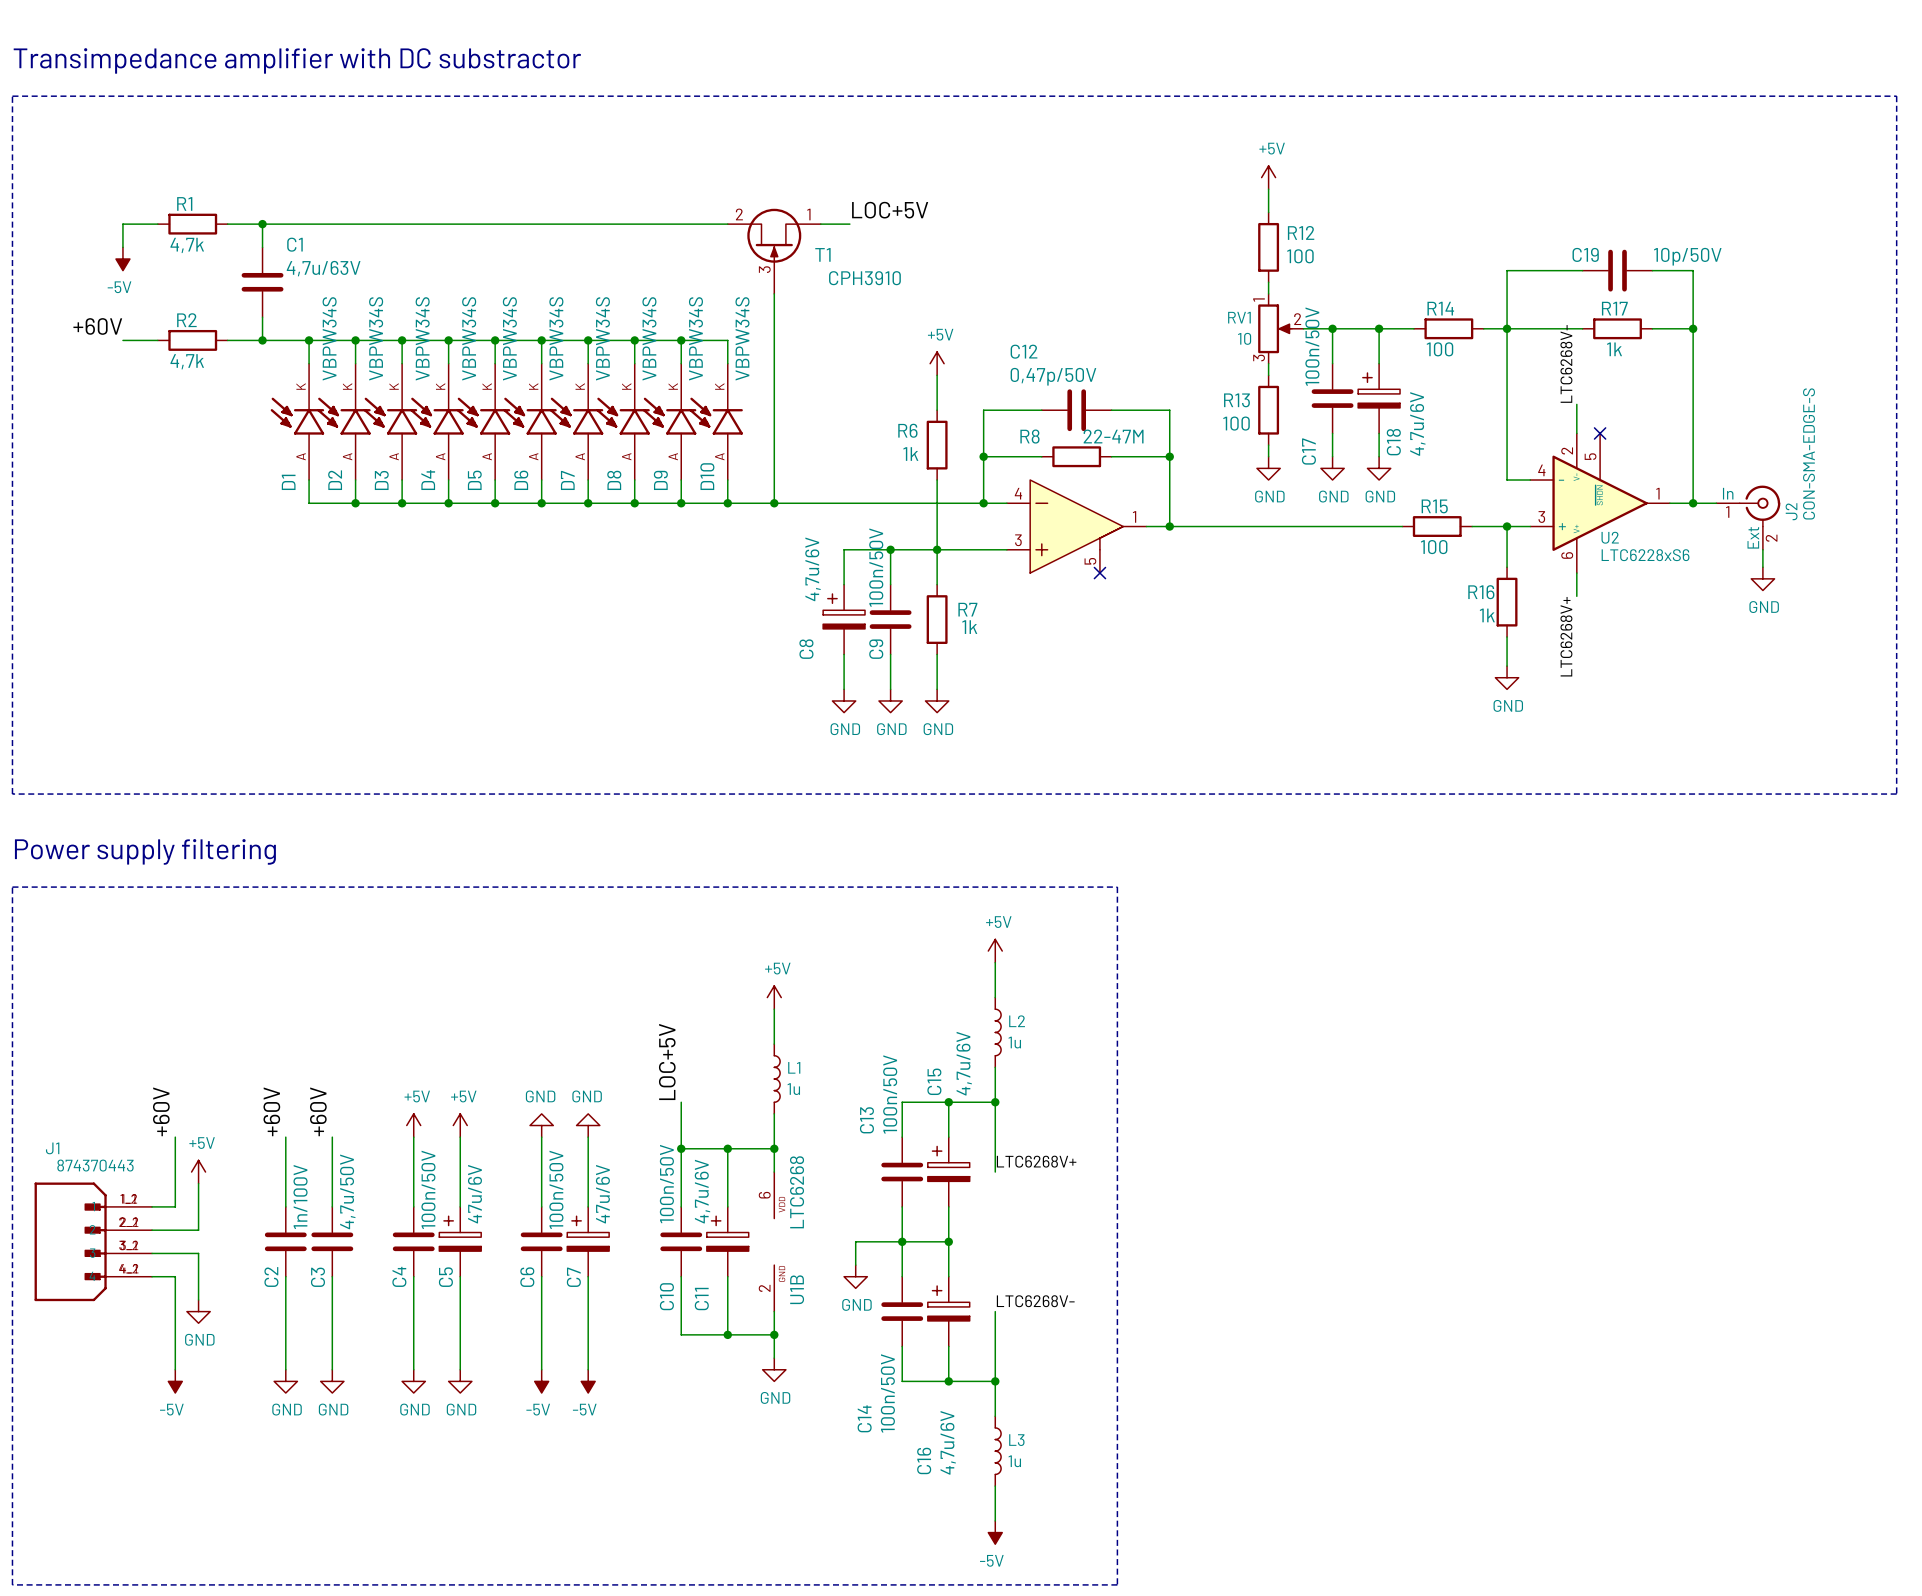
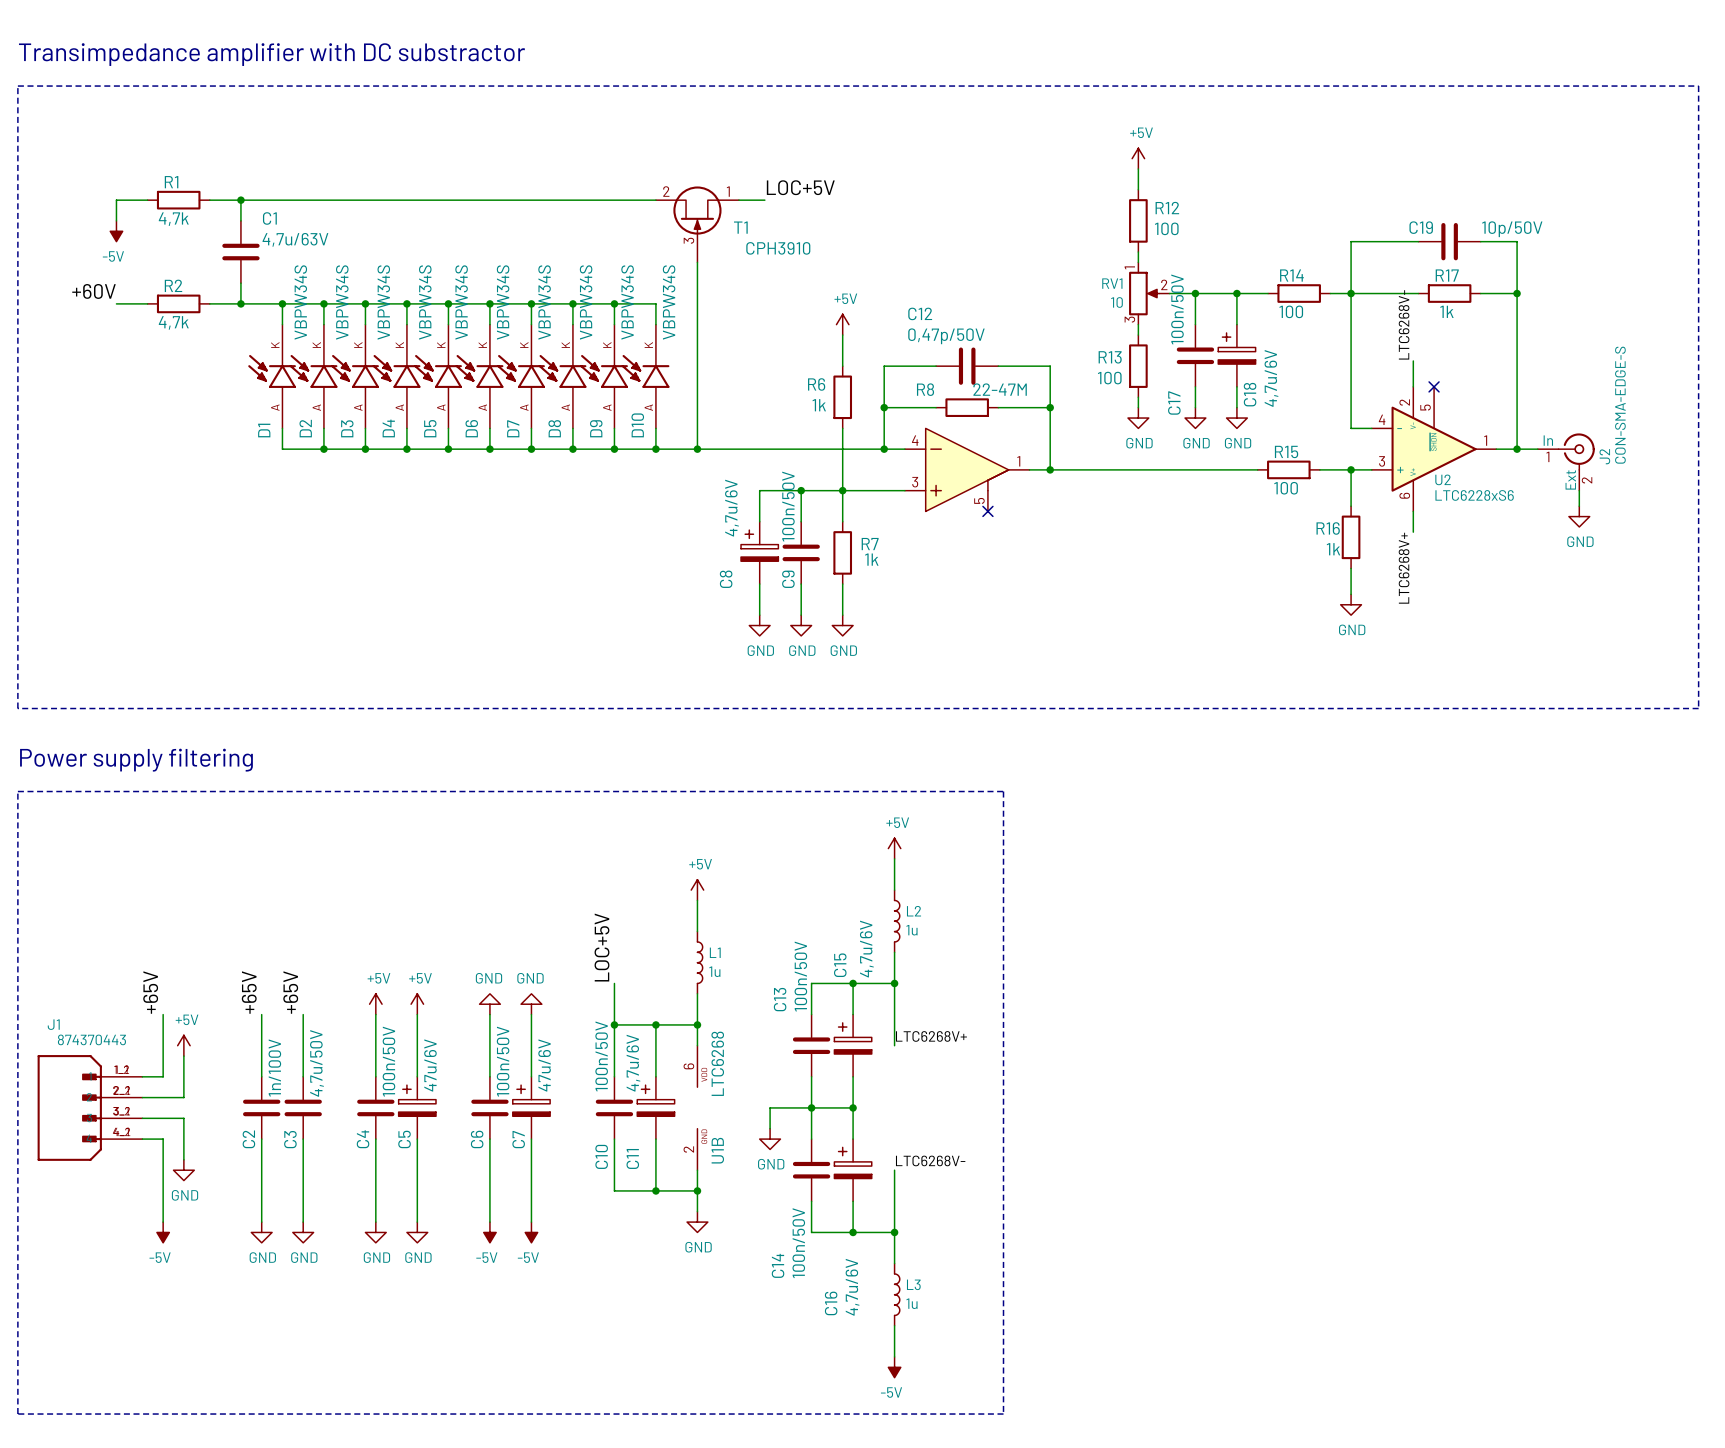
label: +60V (161, 1111) -> +65V (150, 992)
label: +60V (271, 1111) -> +65V (249, 992)
label: +60V (318, 1111) -> +65V (290, 992)

